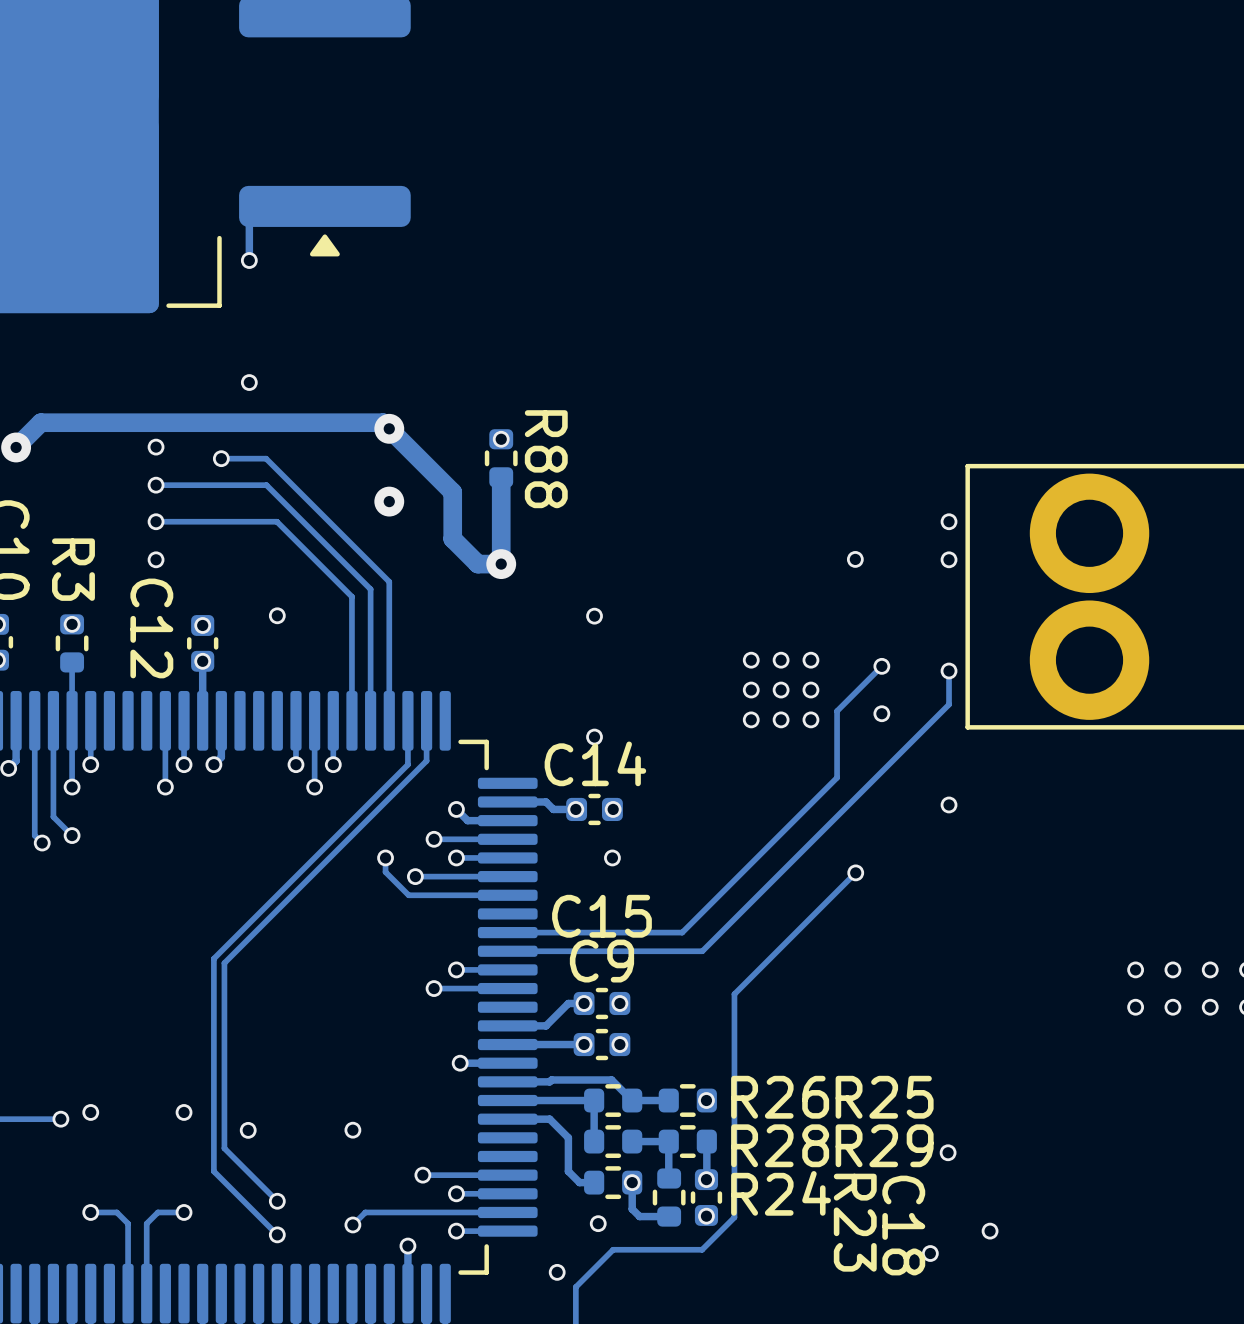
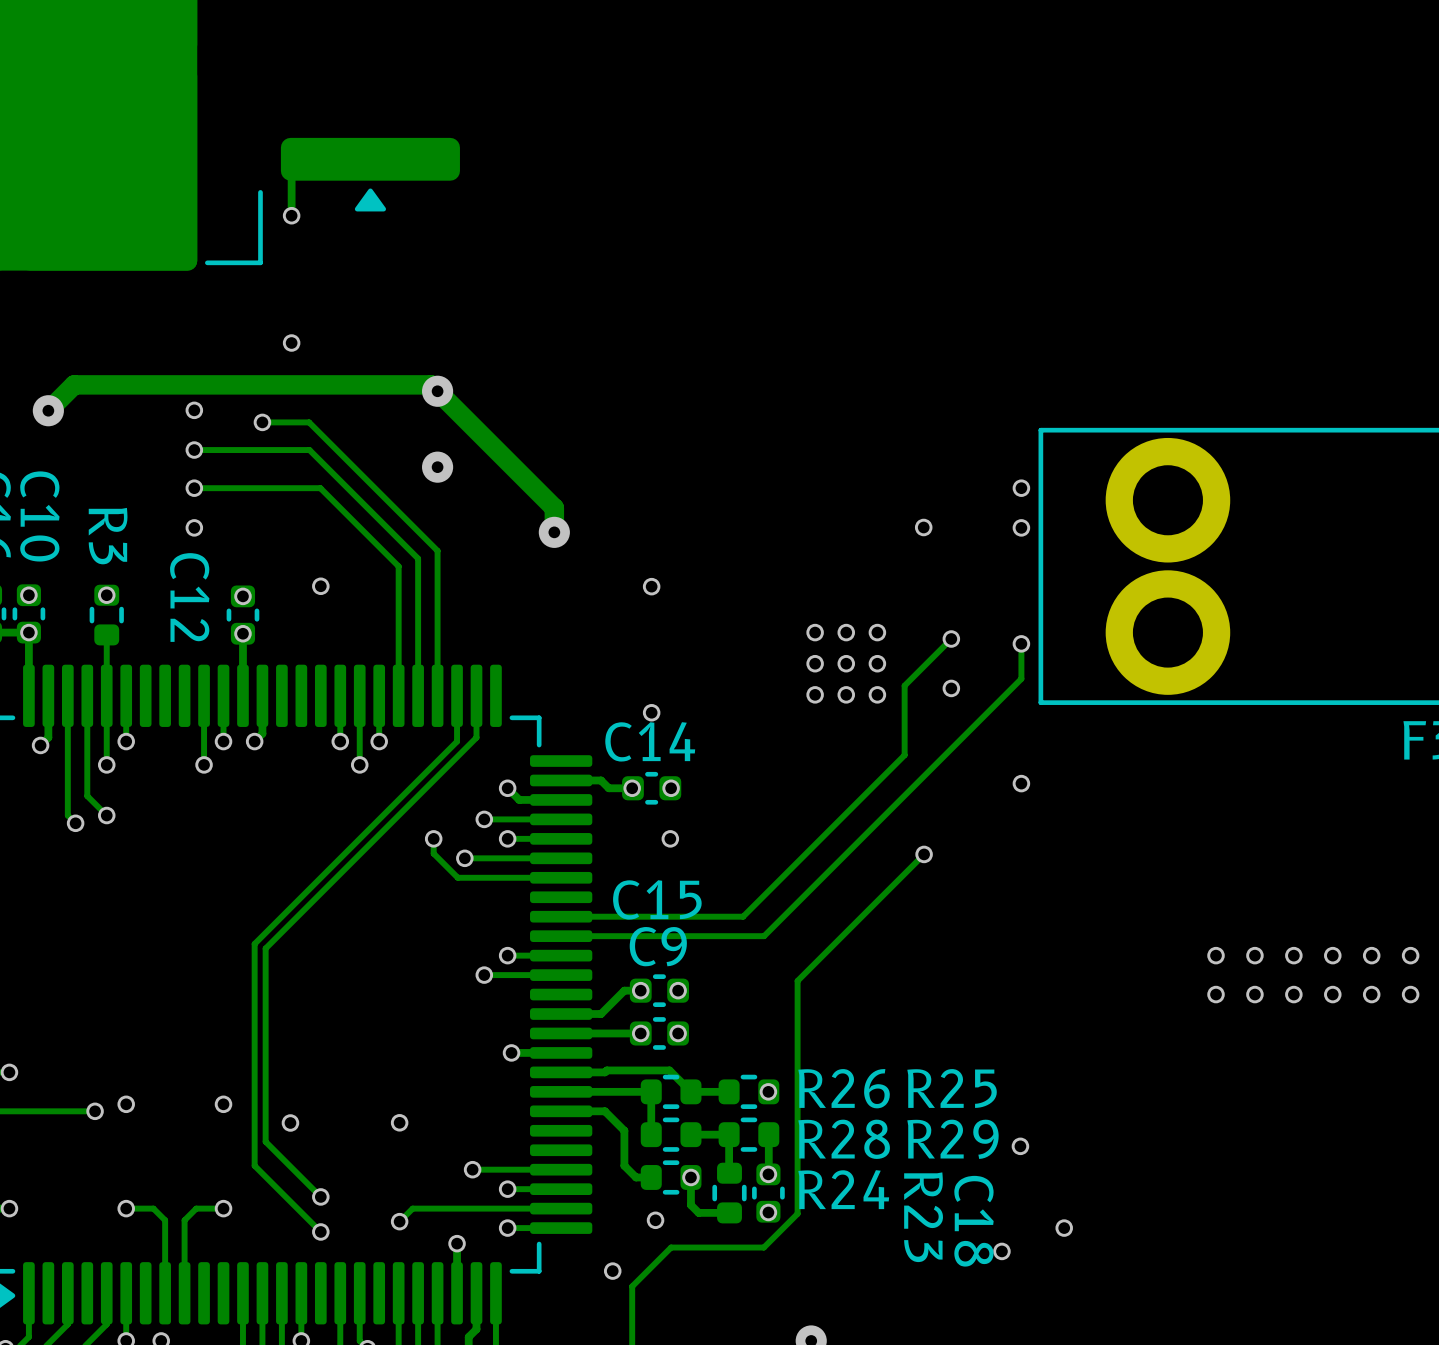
via: (501, 439) -> none
R88: (501, 458) -> none
track: (501, 477) (501, 540) -> none
track: (452, 492) (452, 538) (477, 564) (501, 564) -> (503, 457) (554, 508)

